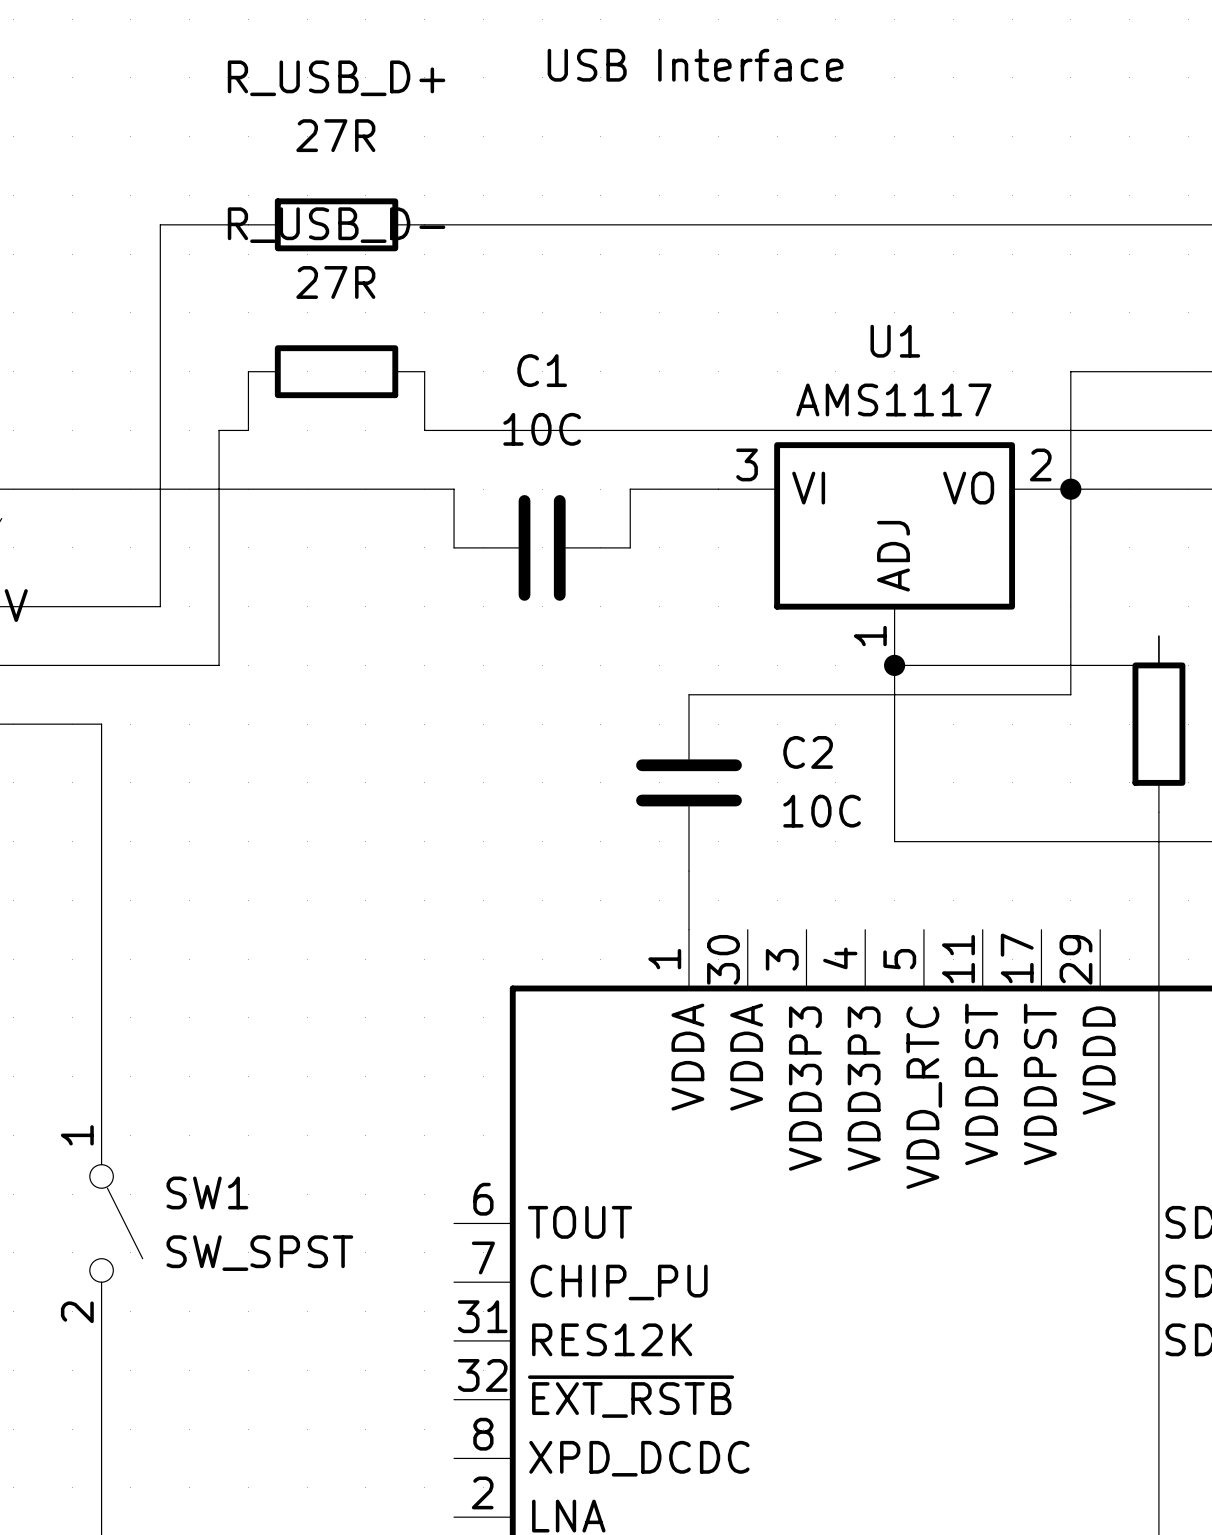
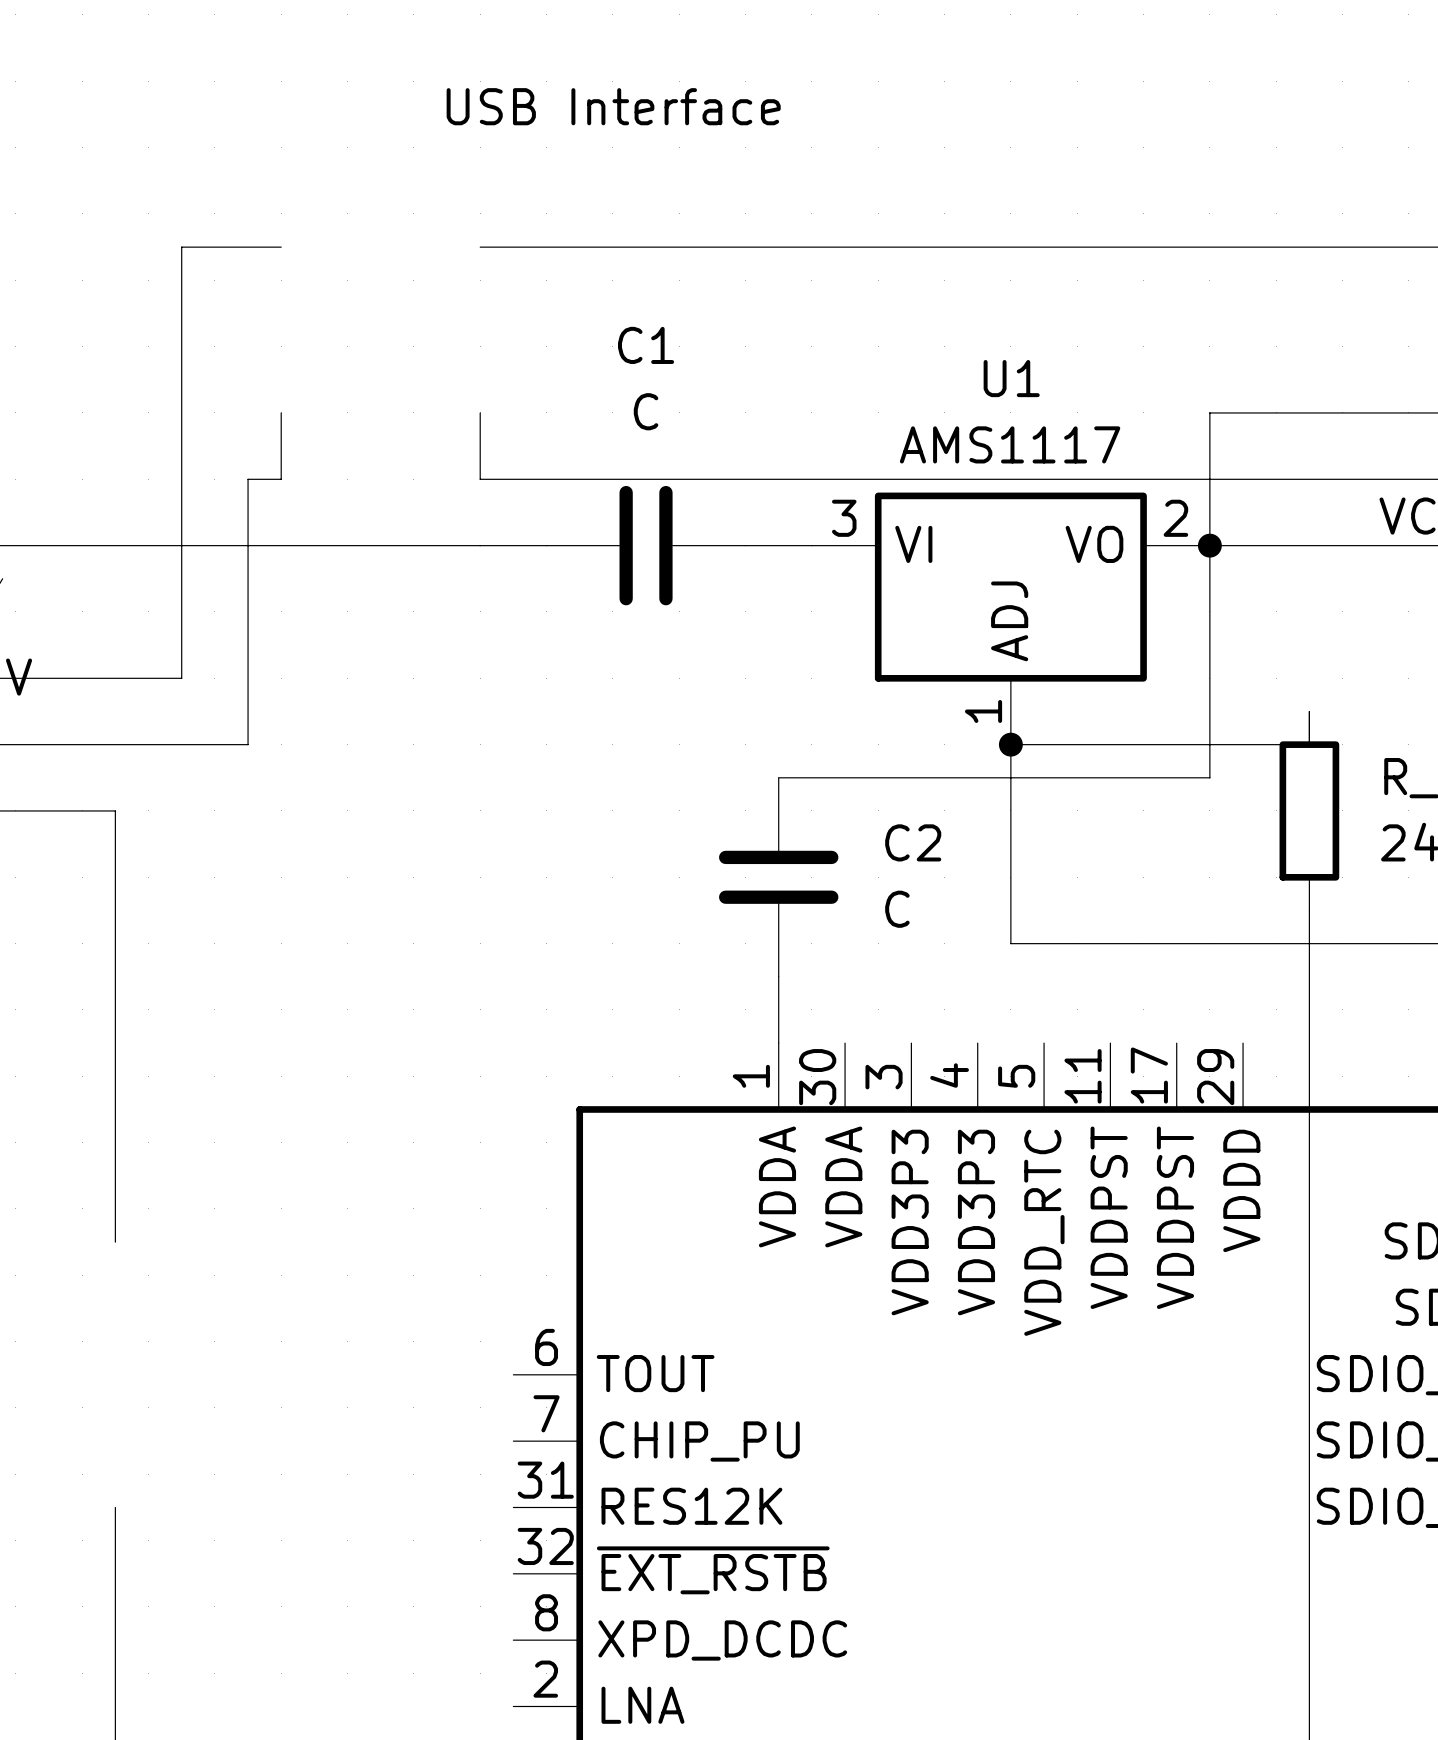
text position: USB Interface (695, 65) -> USB Interface (613, 106)
R_USB_D+: 27R (336, 224) -> none
R_USB_D-: 27R (336, 371) -> none
C1 value: 10C (542, 429) -> C (646, 411)
wire: (454, 489) (454, 547) -> (513, 545) (546, 545)
wire: (659, 489) (630, 489) (630, 547) -> none
C1 position: (542, 547) -> (646, 545)
C2 value: 10C (822, 811) -> C (897, 909)
SW1: SW_SPST (116, 1223) -> none

